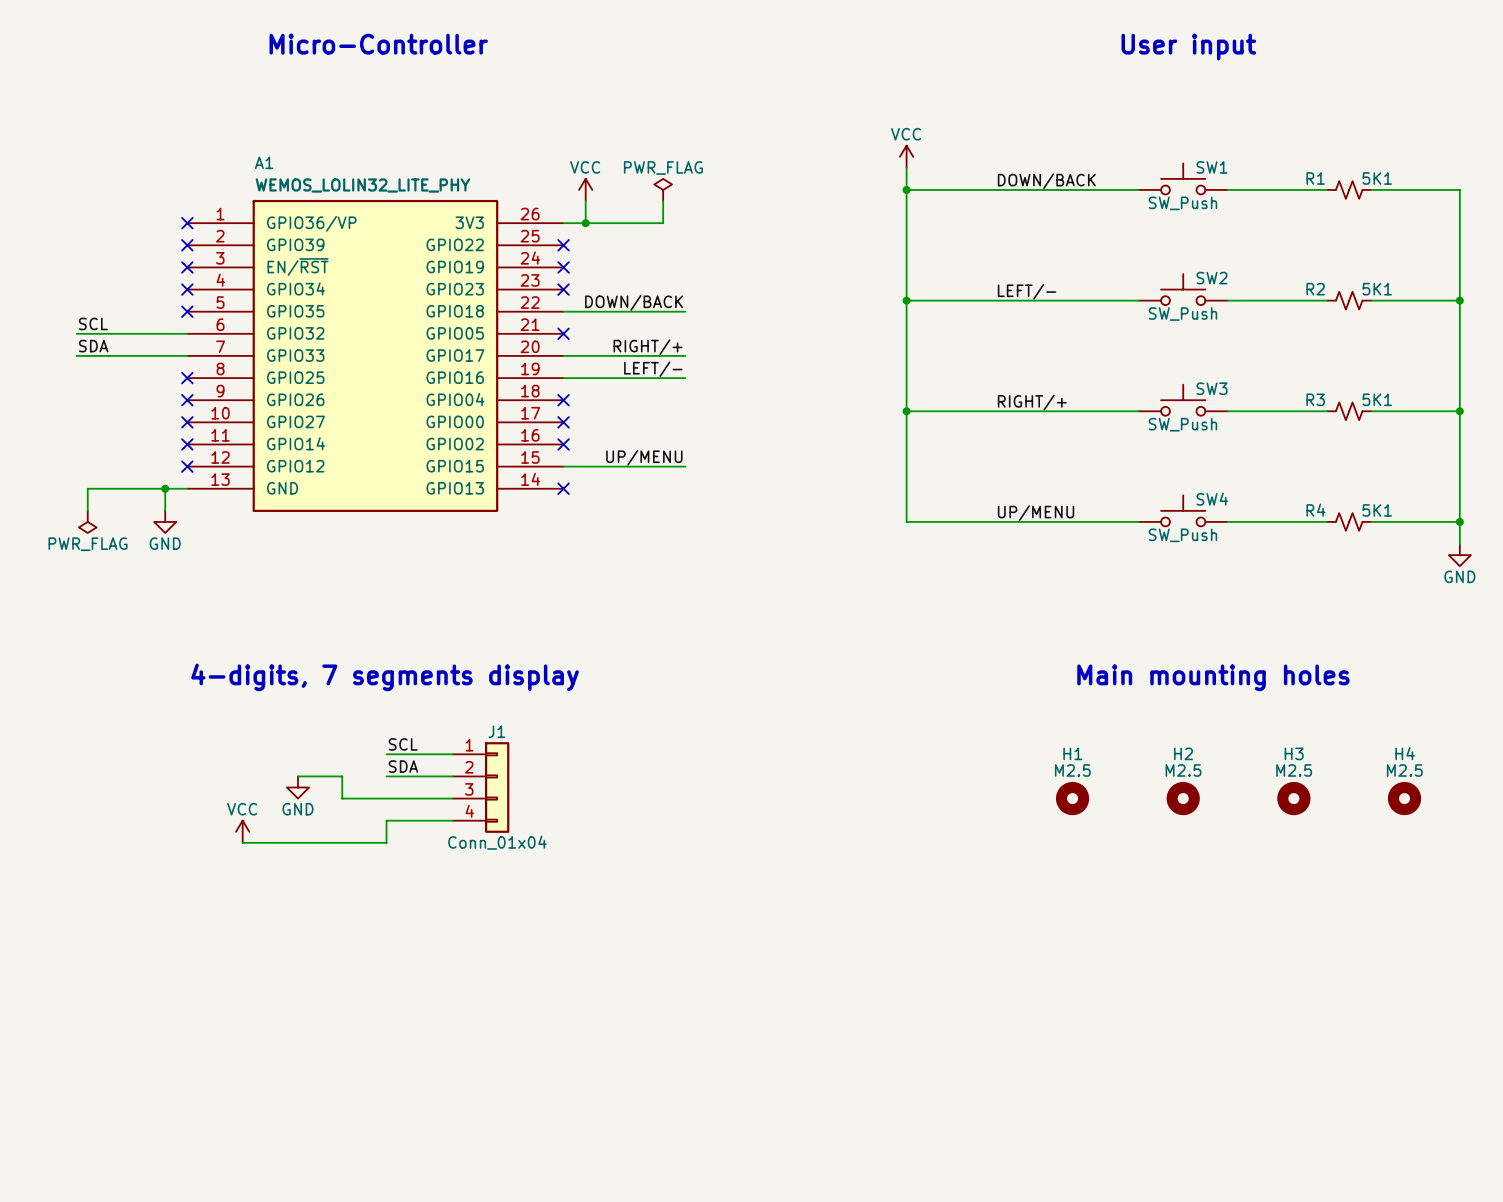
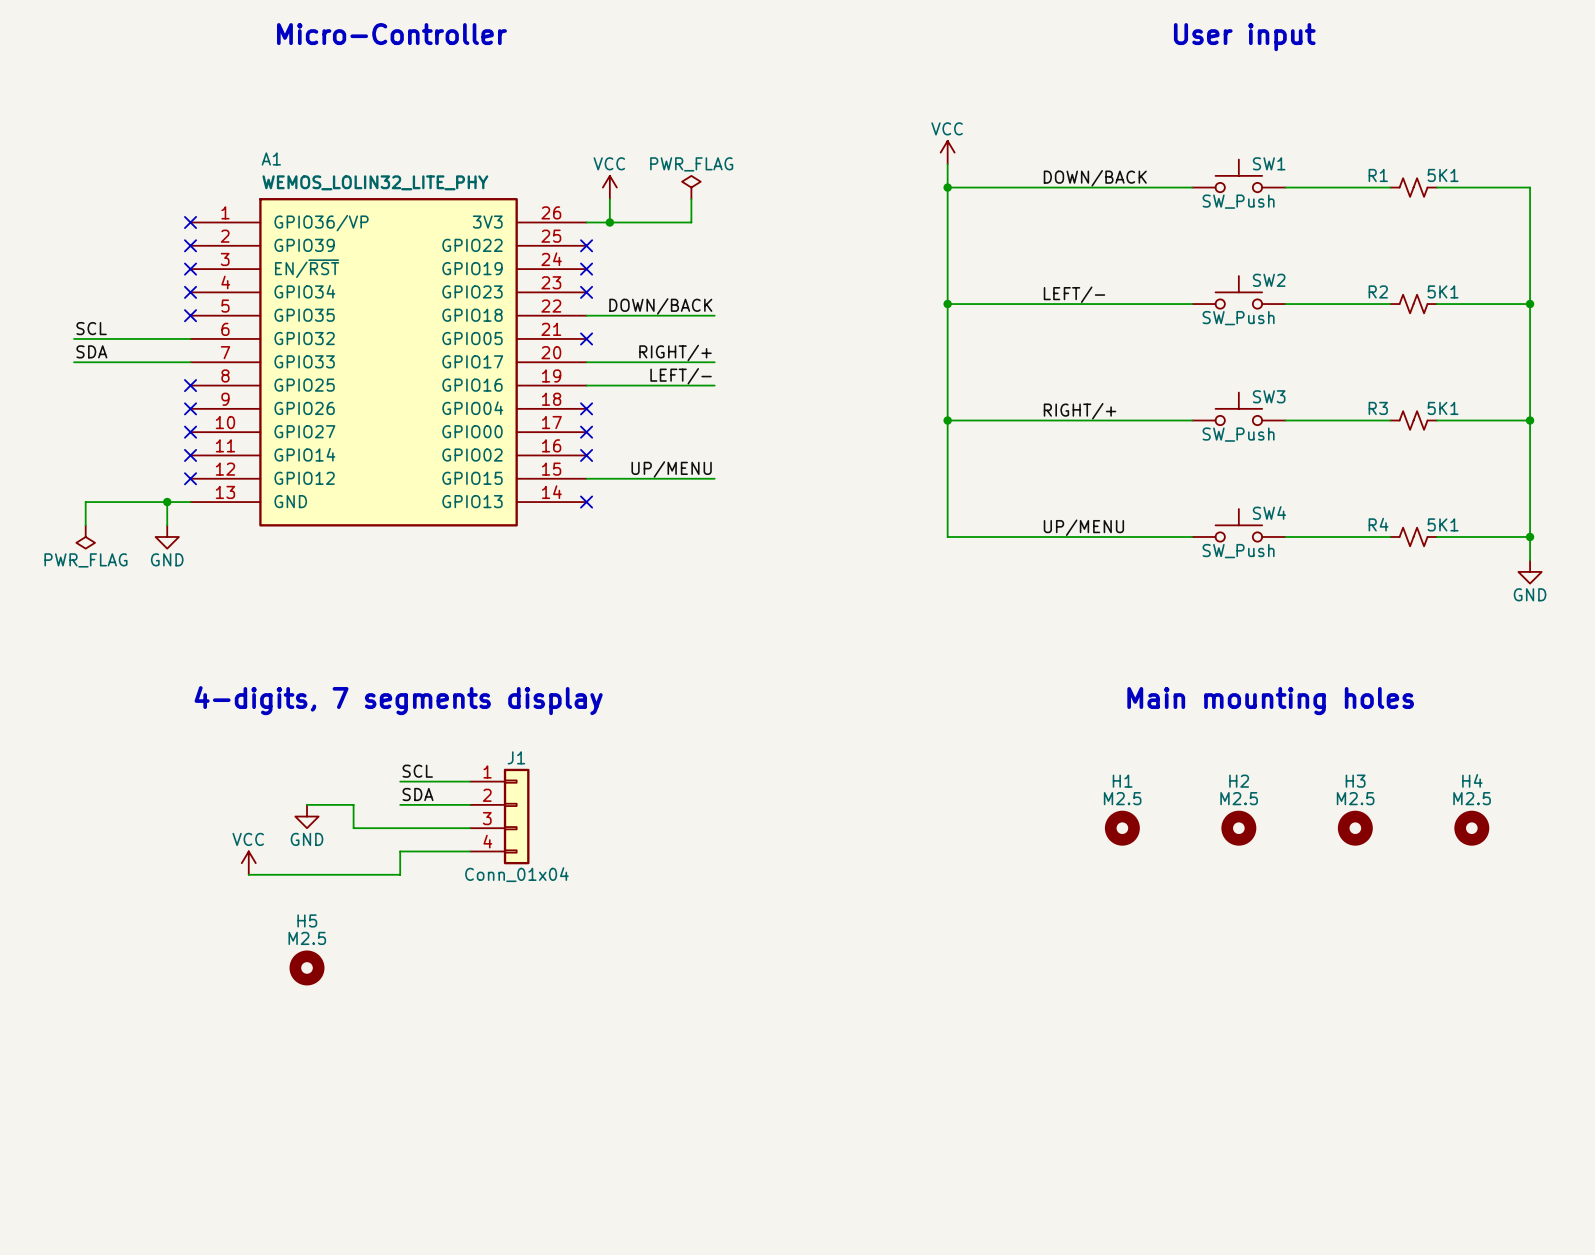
H5: none -> M2.5 (307, 967)

